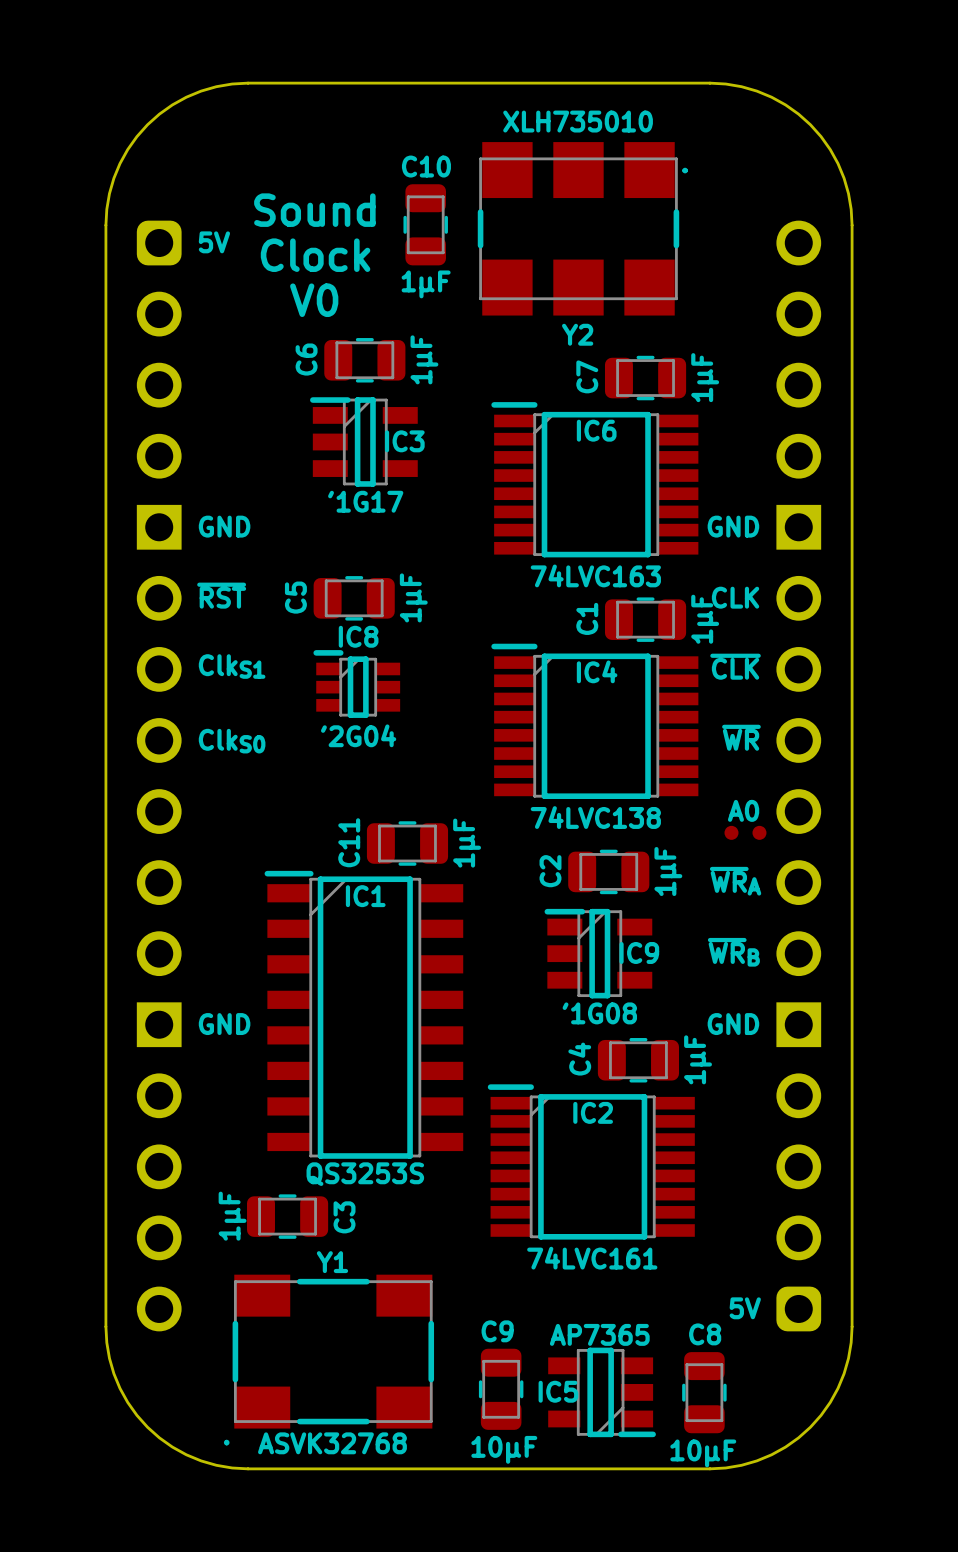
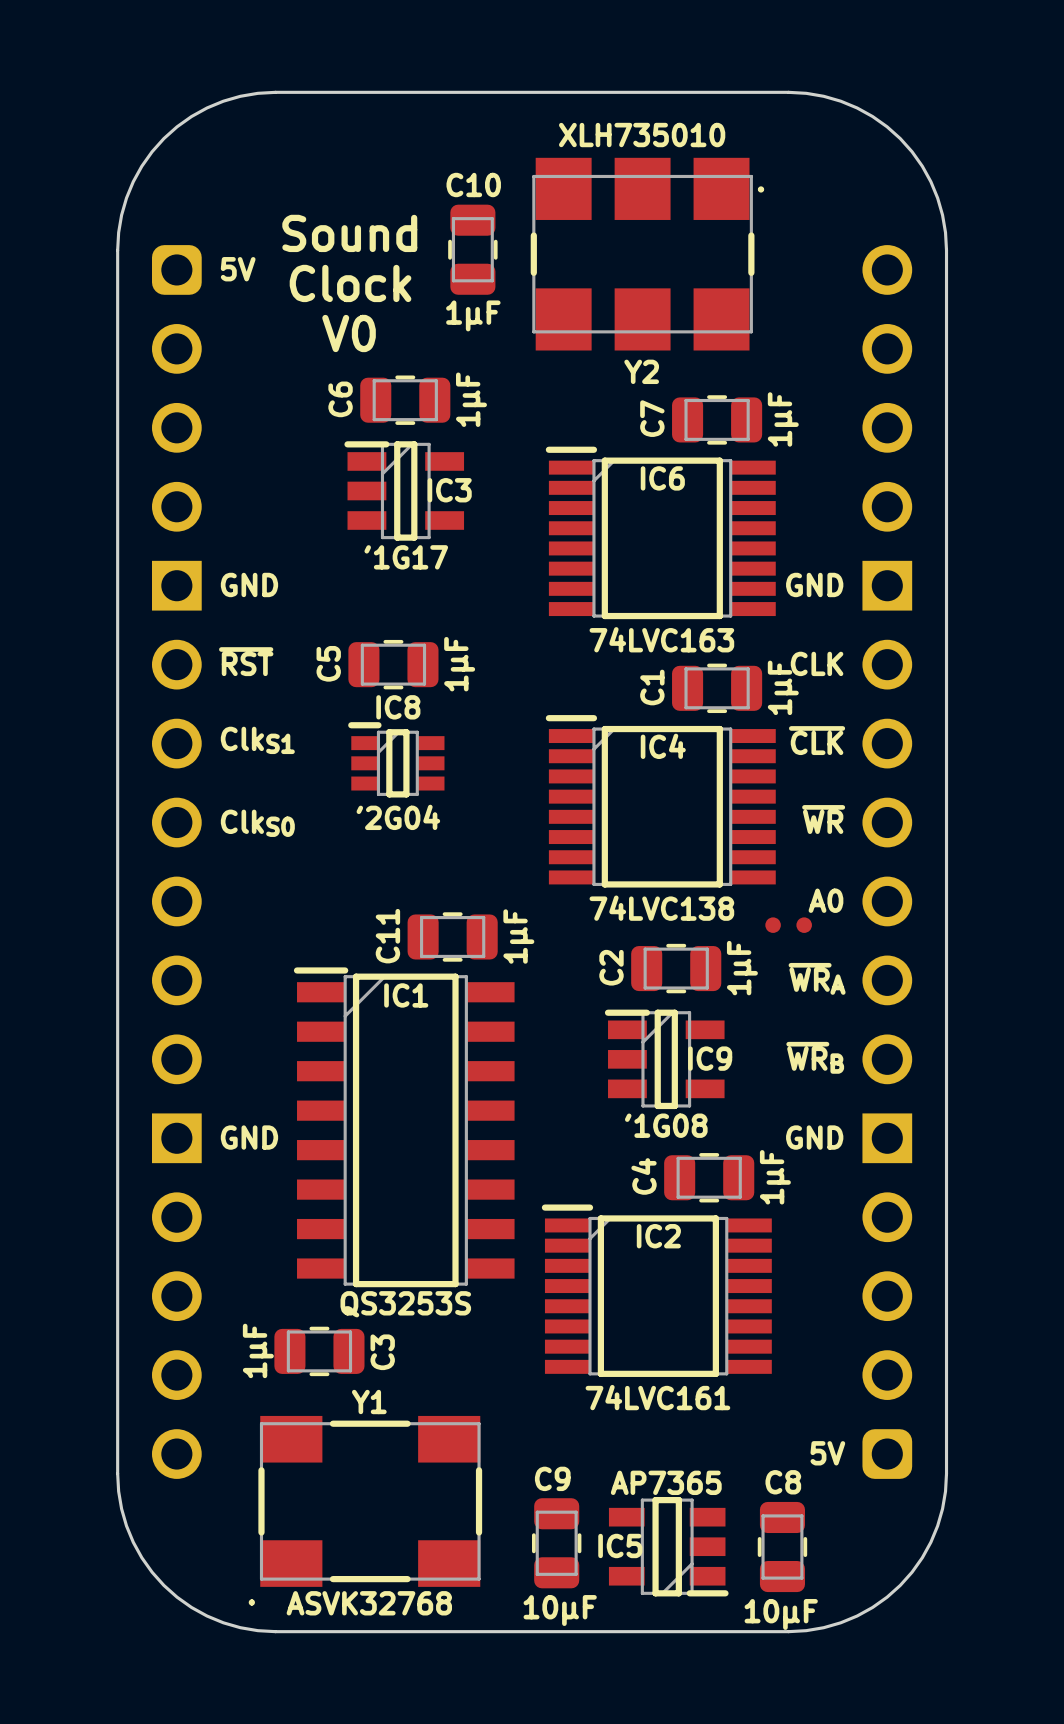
part position: (745, 832) -> (788, 925)

